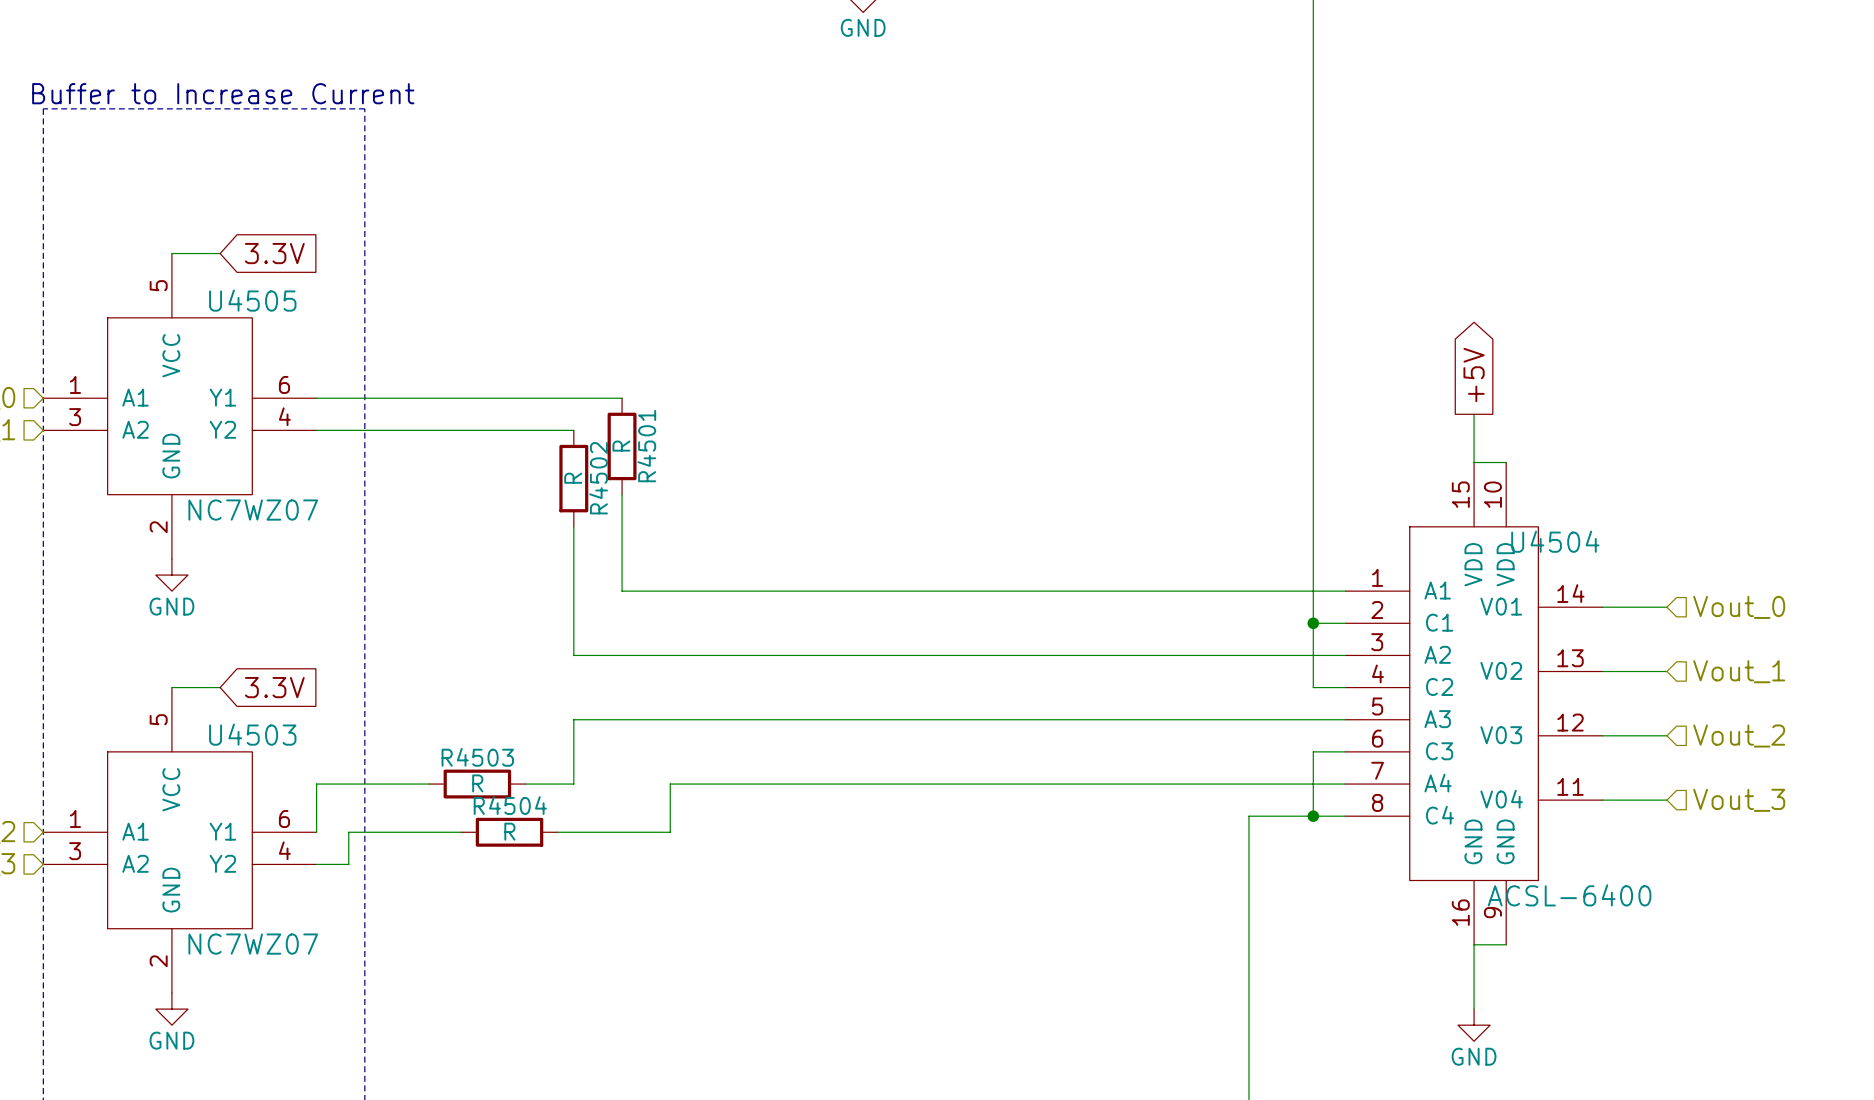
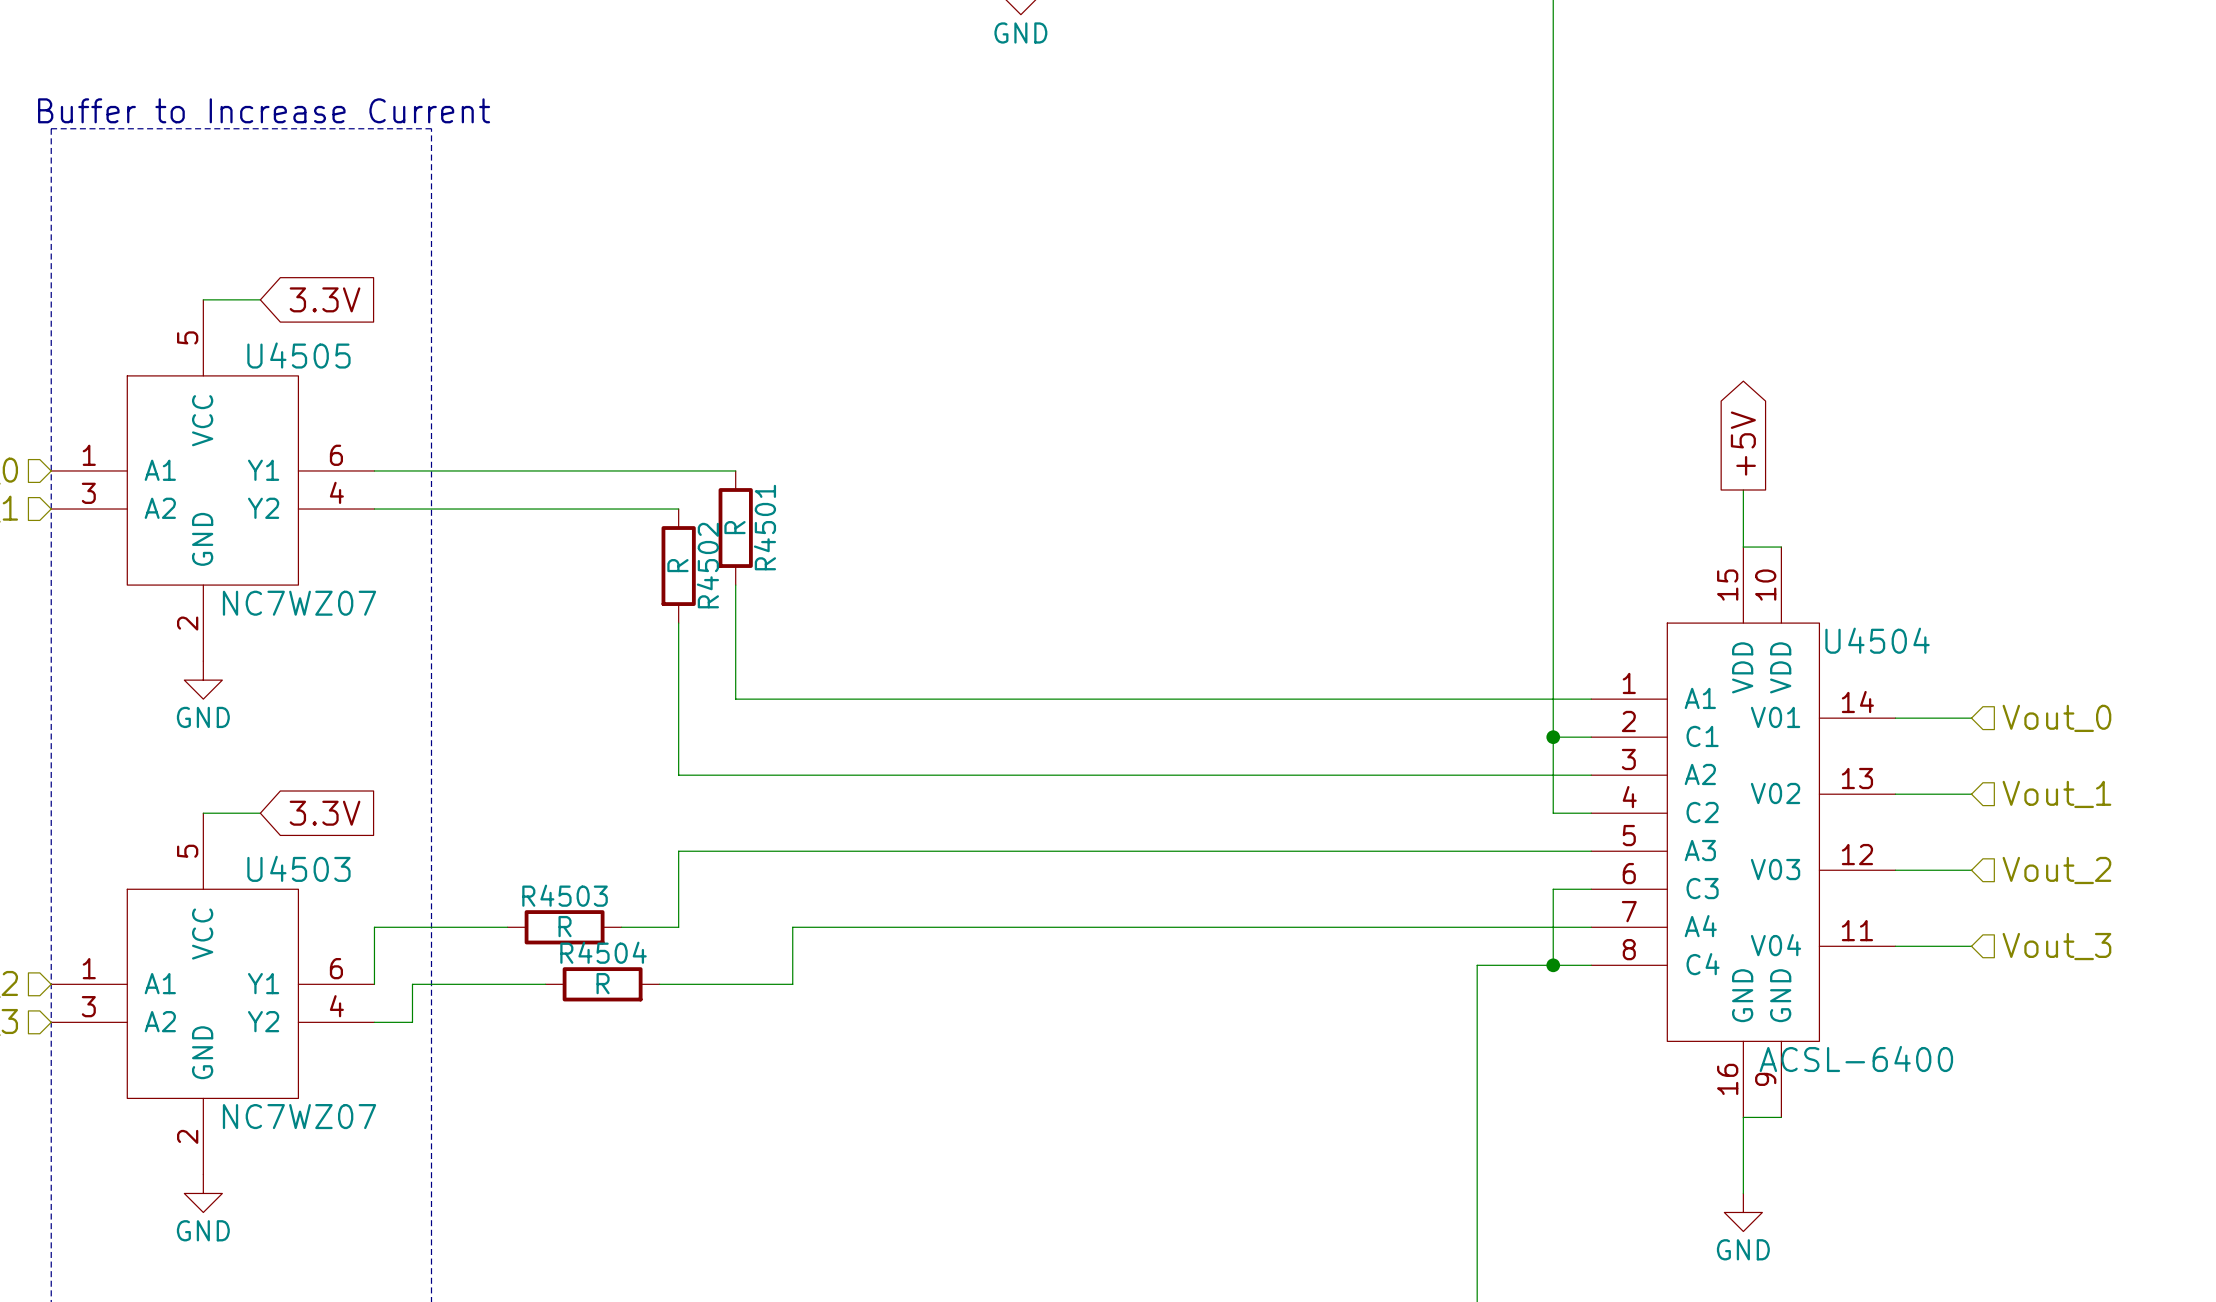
U4504 name position: U4504 (1555, 541) -> U4504 (1877, 640)

